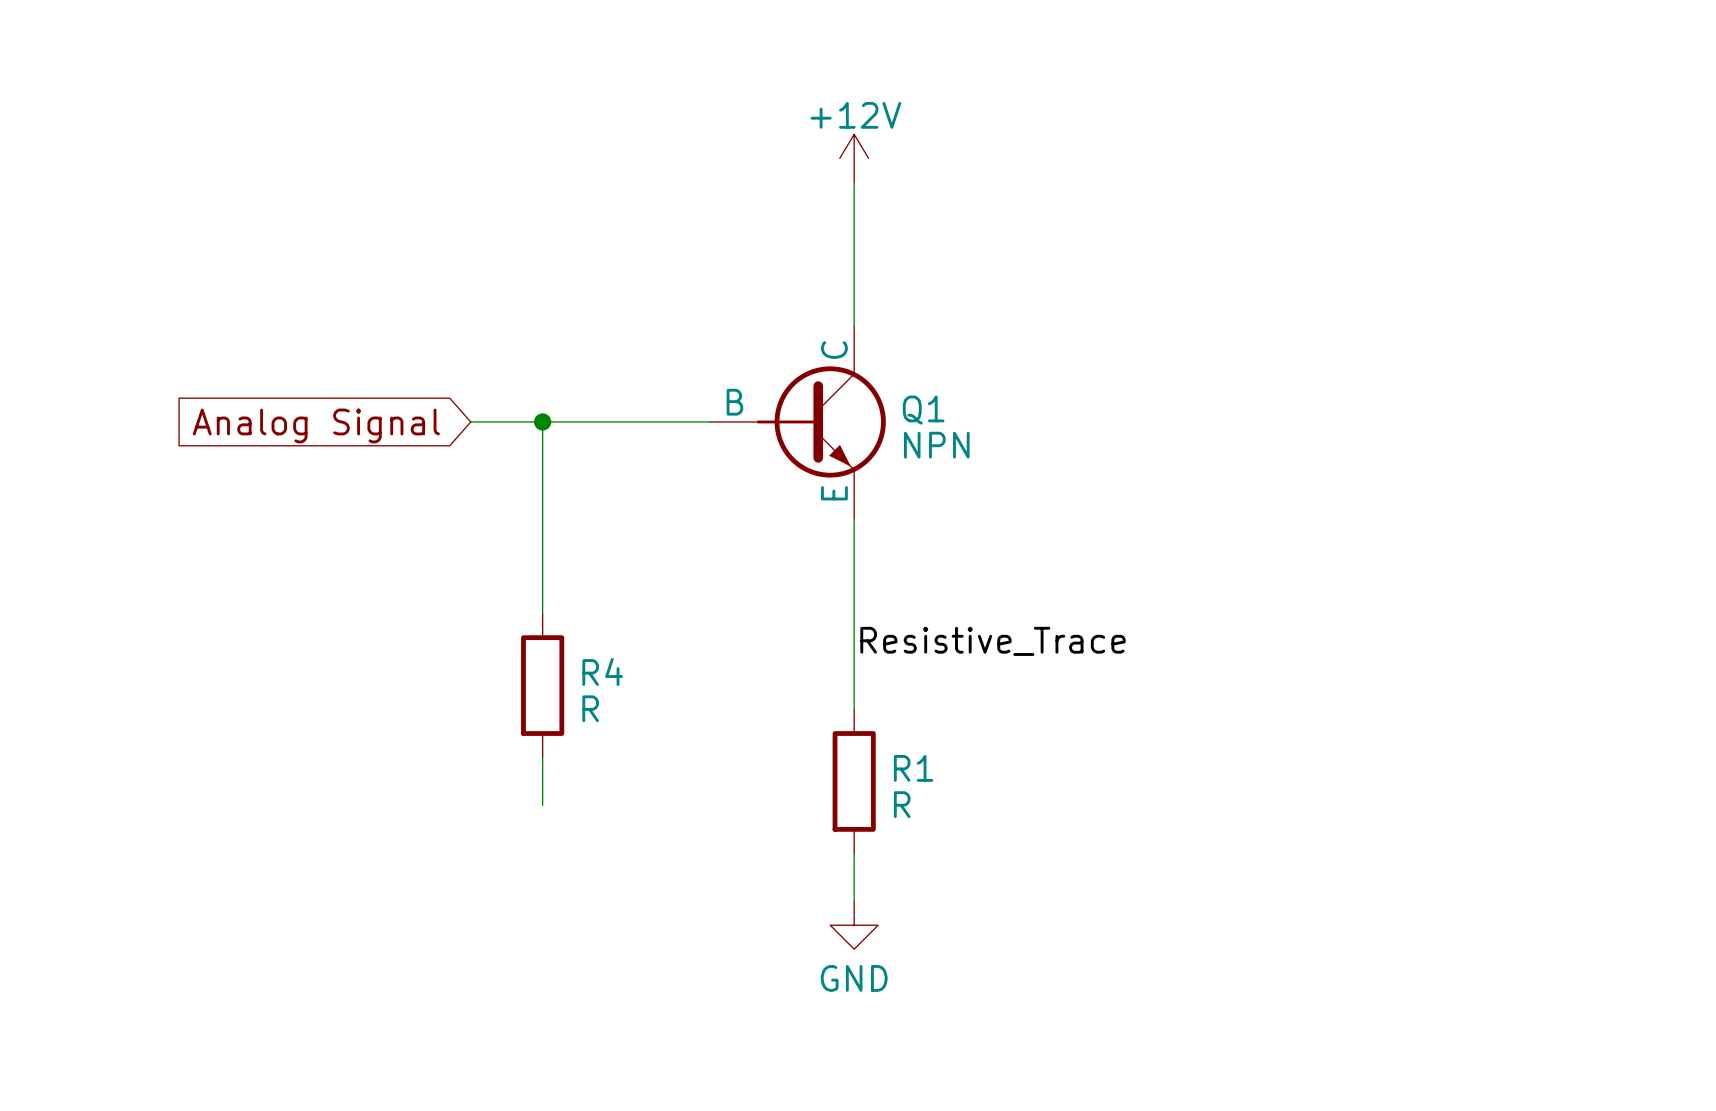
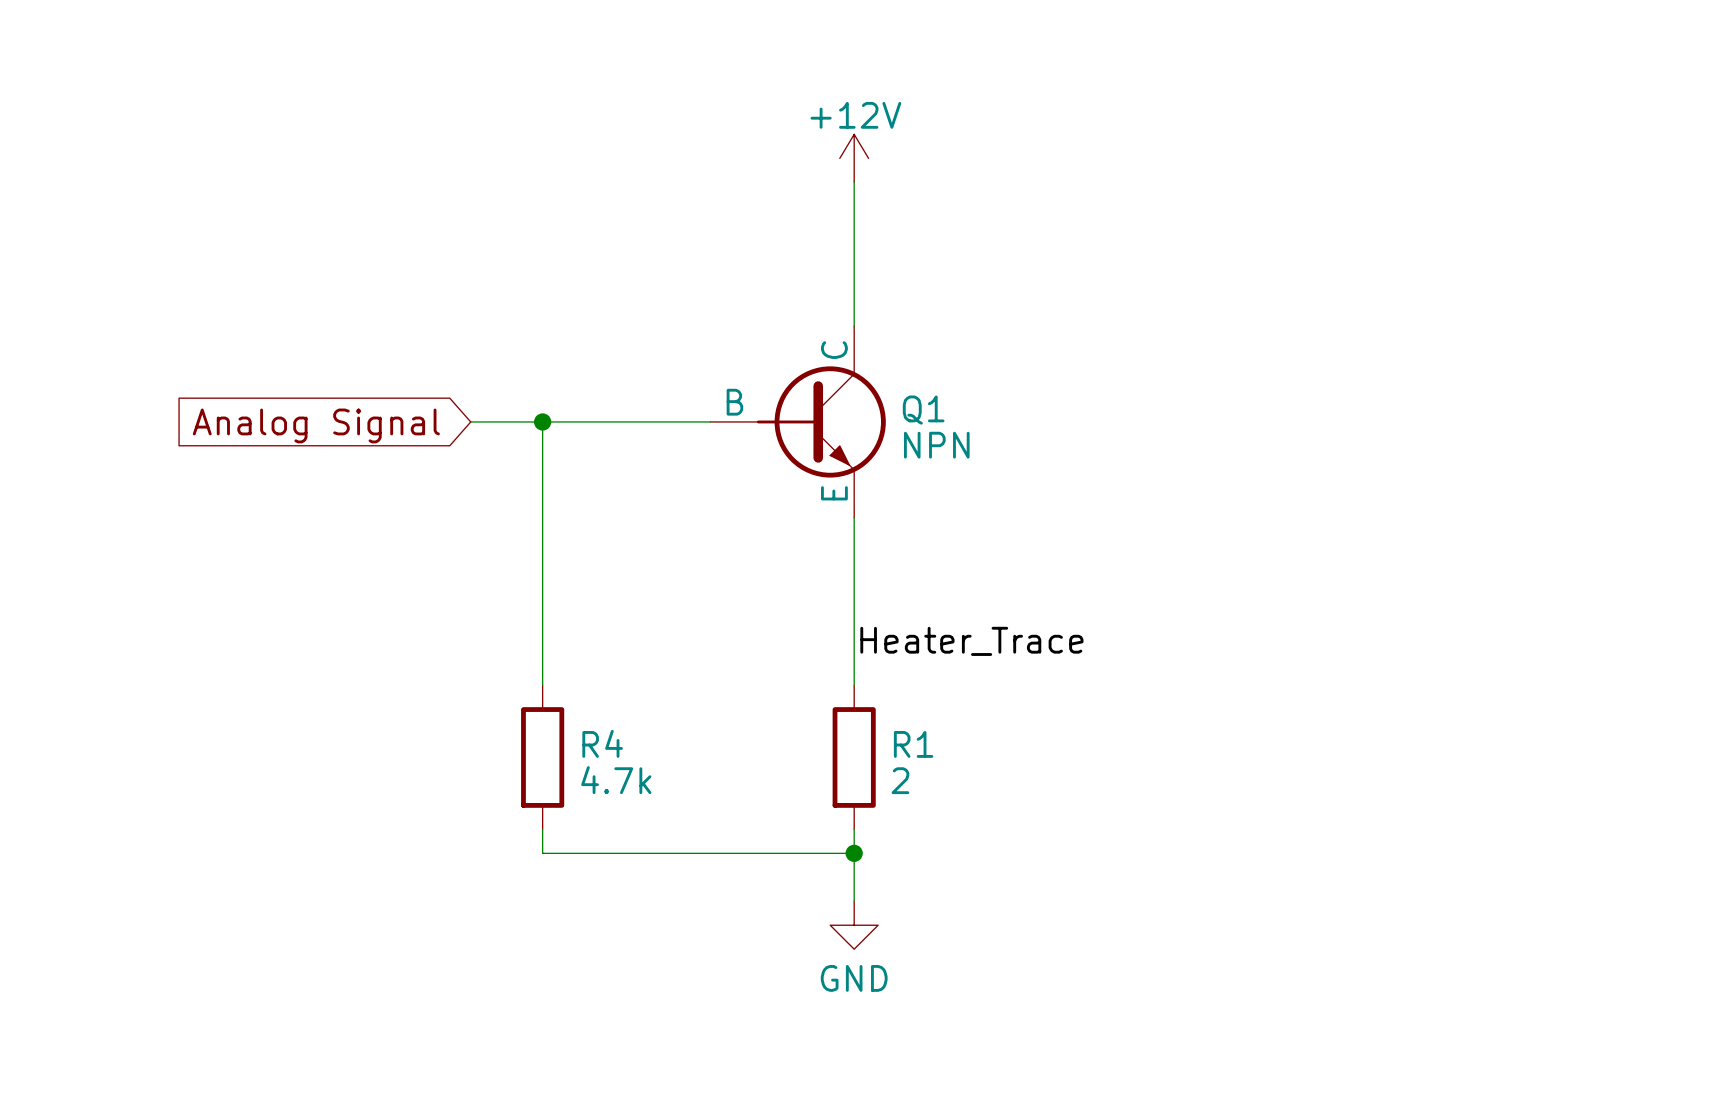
wire: none -> (542, 613) (542, 685)
label: Resistive_Trace (993, 641) -> Heater_Trace (971, 641)
R4 position: (542, 685) -> (542, 757)
R4 value: R (590, 708) -> 4.7k (616, 780)
wire: (542, 757) (542, 805) -> none
R1 position: (854, 781) -> (854, 757)
R1 value: R (902, 804) -> 2 (900, 780)
wire: none -> (542, 829) (542, 853) (854, 853) (854, 829)
junction: none -> (854, 853)

